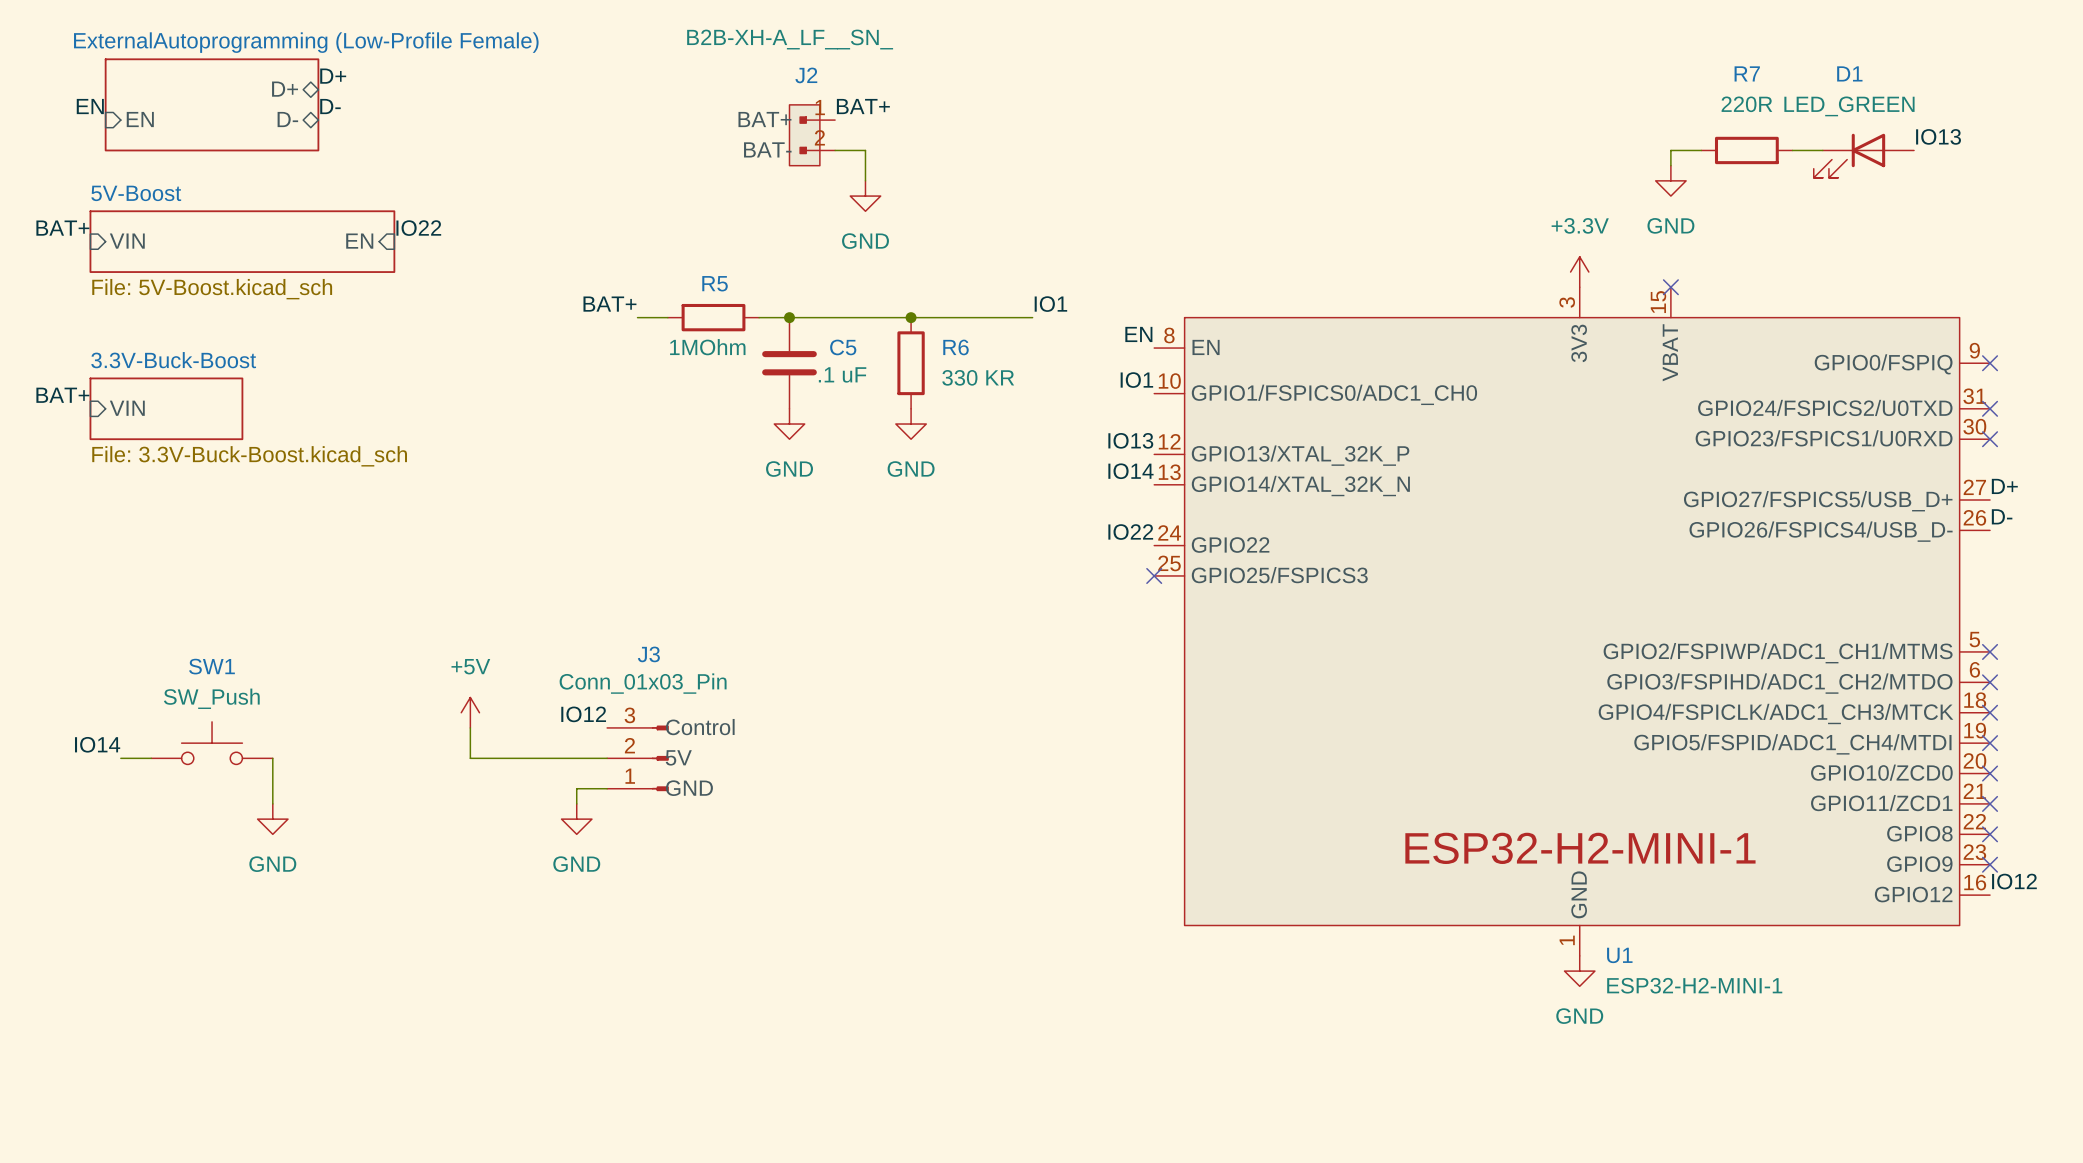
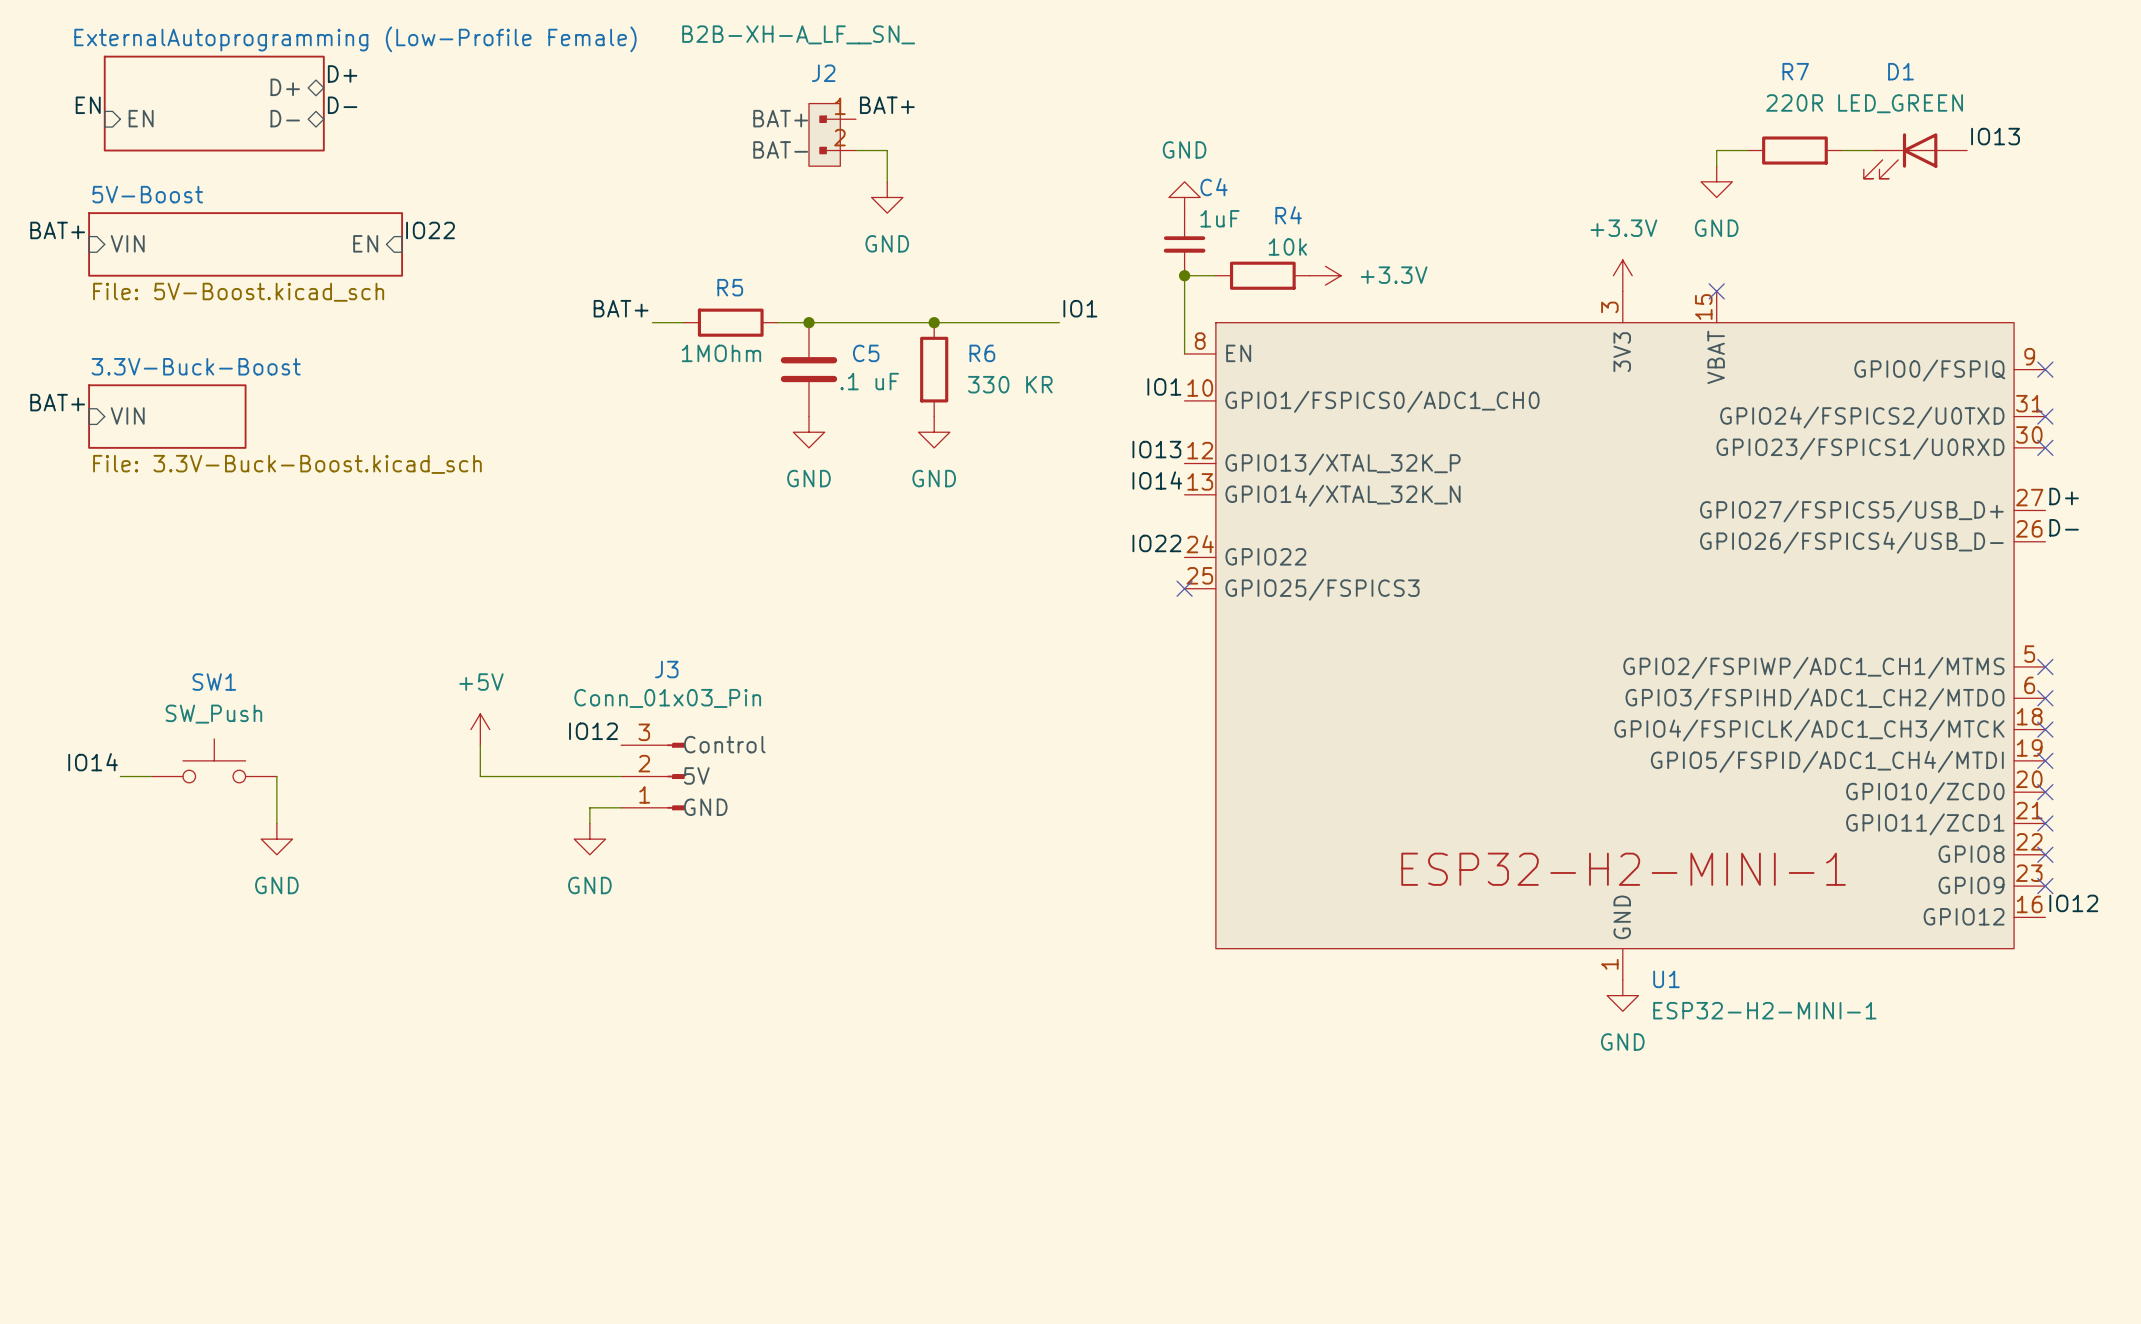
power symbol: none -> GND (1184, 197)
C4: none -> 1uF (1184, 244)
junction: none -> (1184, 275)
wire: none -> (1215, 275) (1184, 275) (1184, 353)
R4: none -> 10k (1262, 275)
power symbol: none -> +3.3V (1325, 275)
label: EN (1138, 334) -> none

